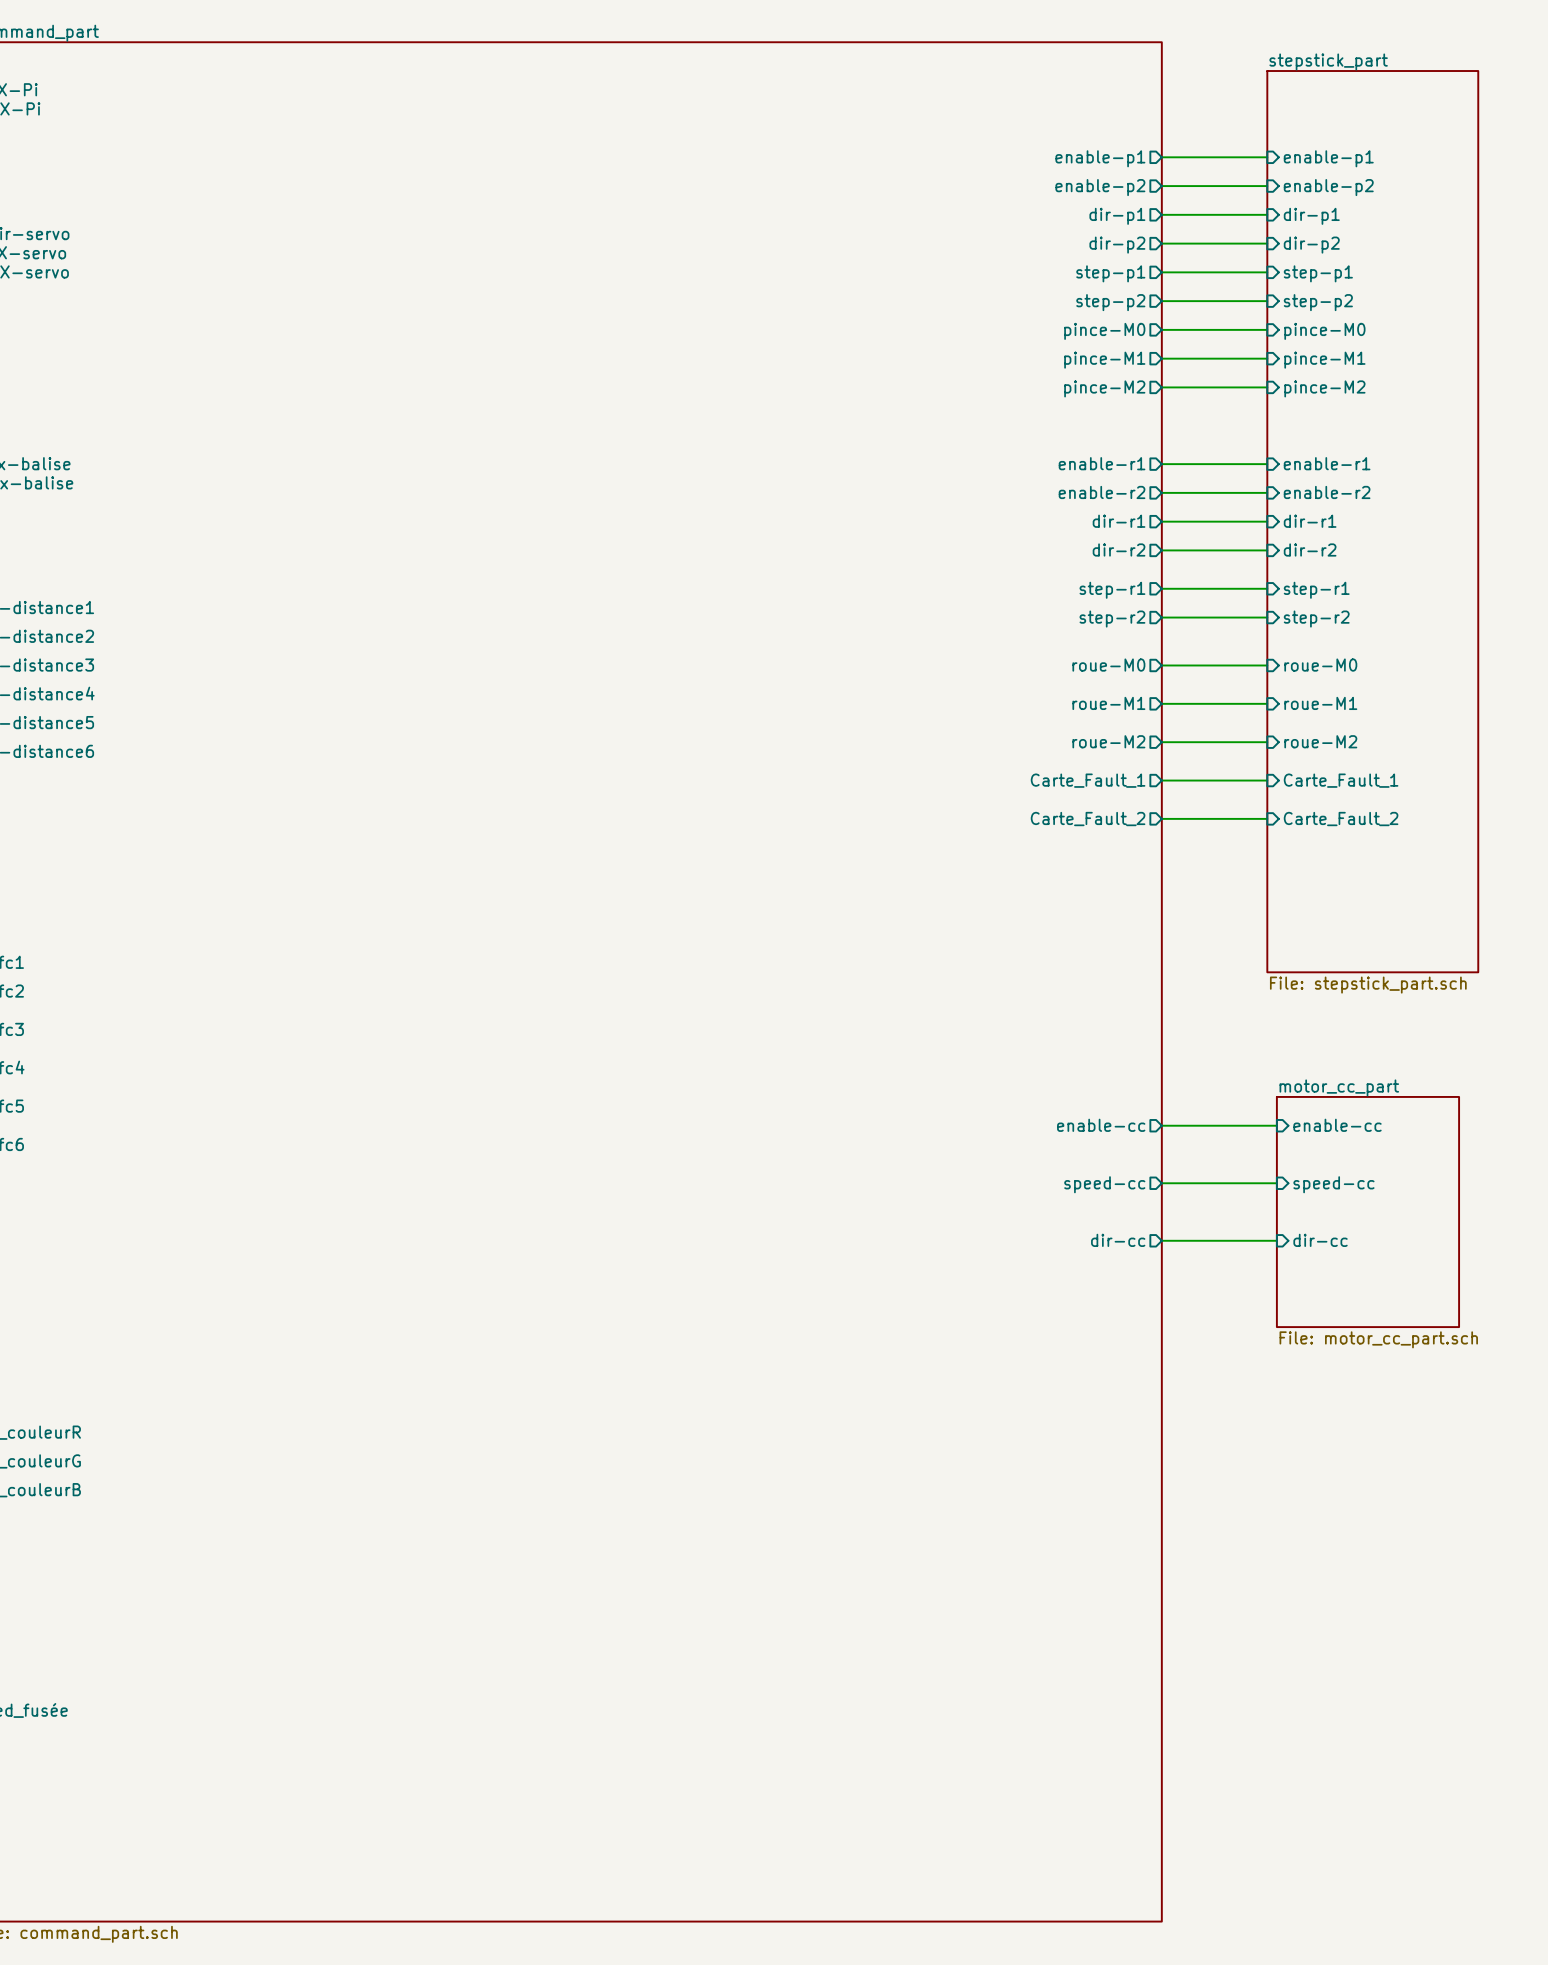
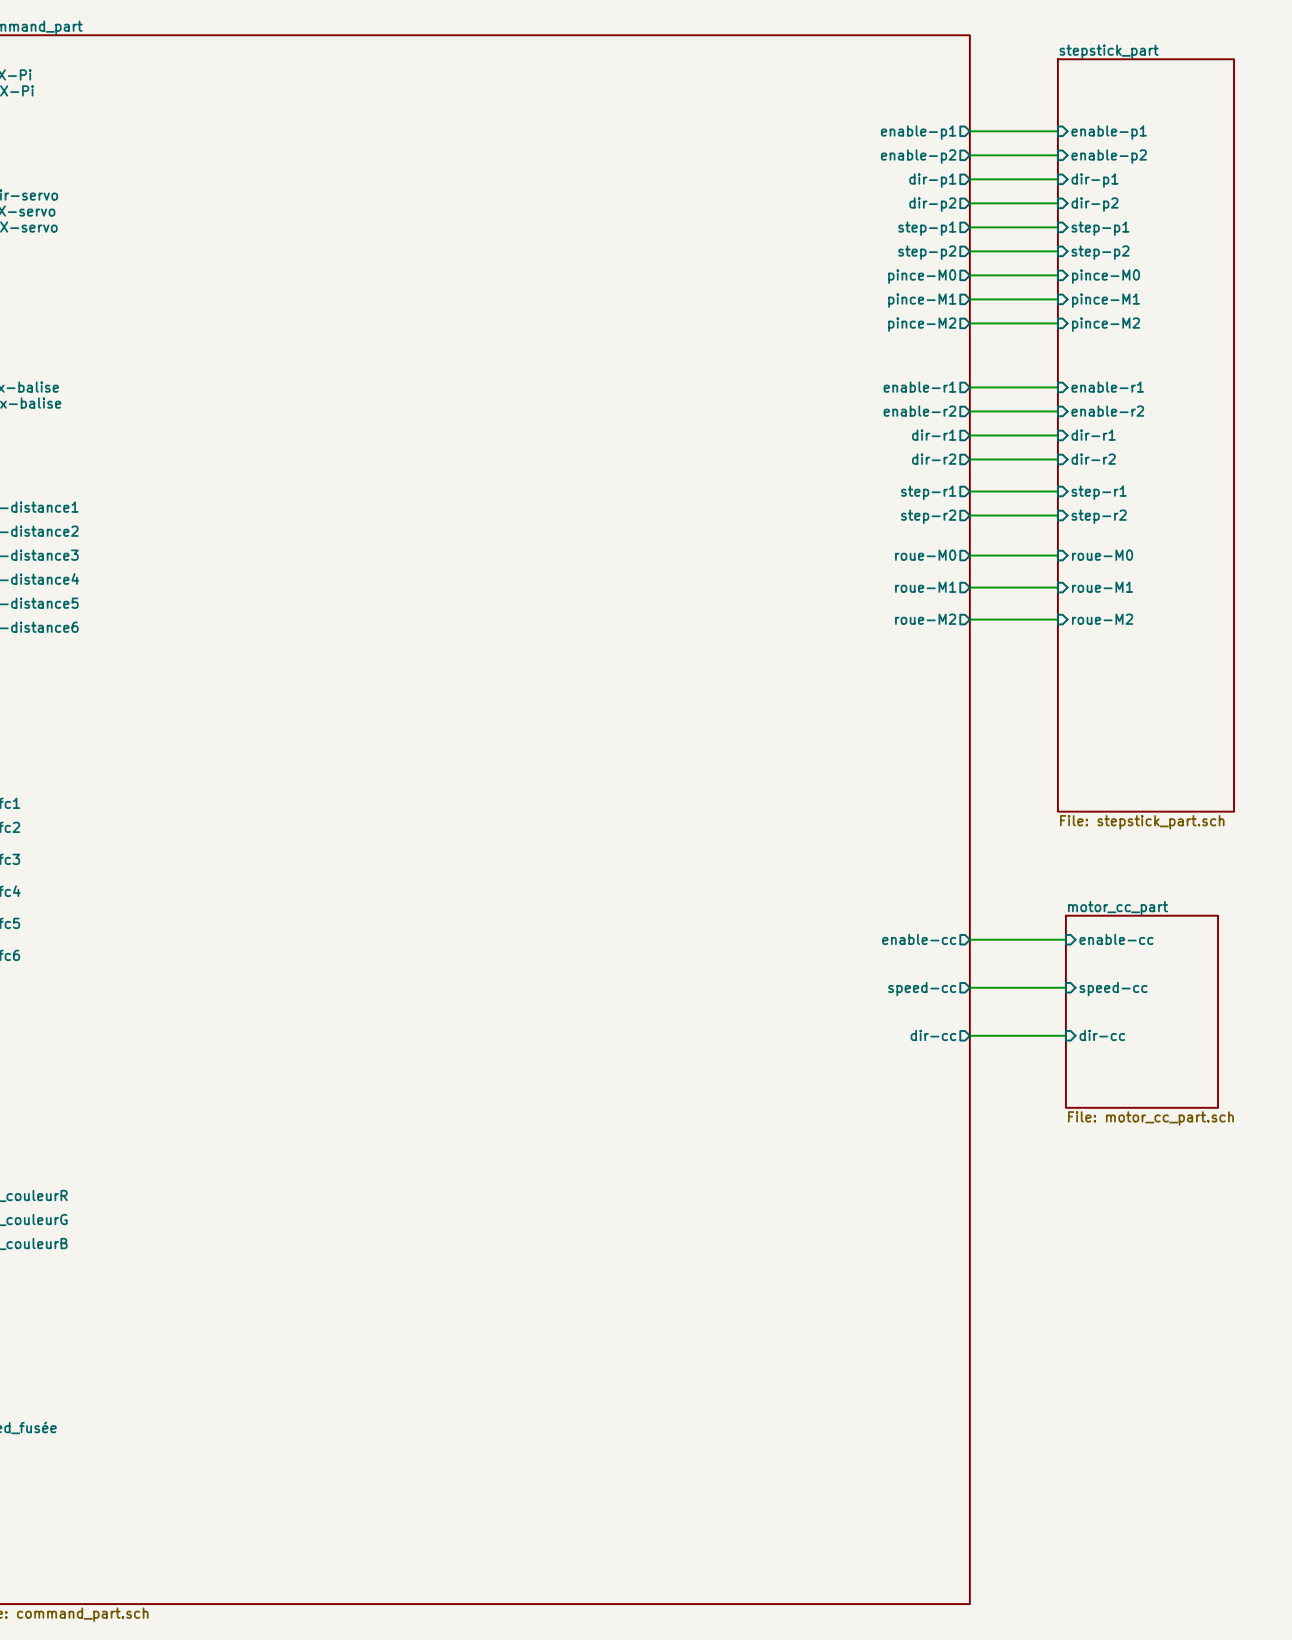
sheet pin: Carte_Fault_1 (1088, 780) -> none
wire: (1161, 780) (1267, 780) -> none
sheet pin: Carte_Fault_1 (1341, 780) -> none
wire: (1161, 818) (1267, 818) -> none
sheet pin: Carte_Fault_2 (1088, 819) -> none
sheet pin: Carte_Fault_2 (1341, 819) -> none

